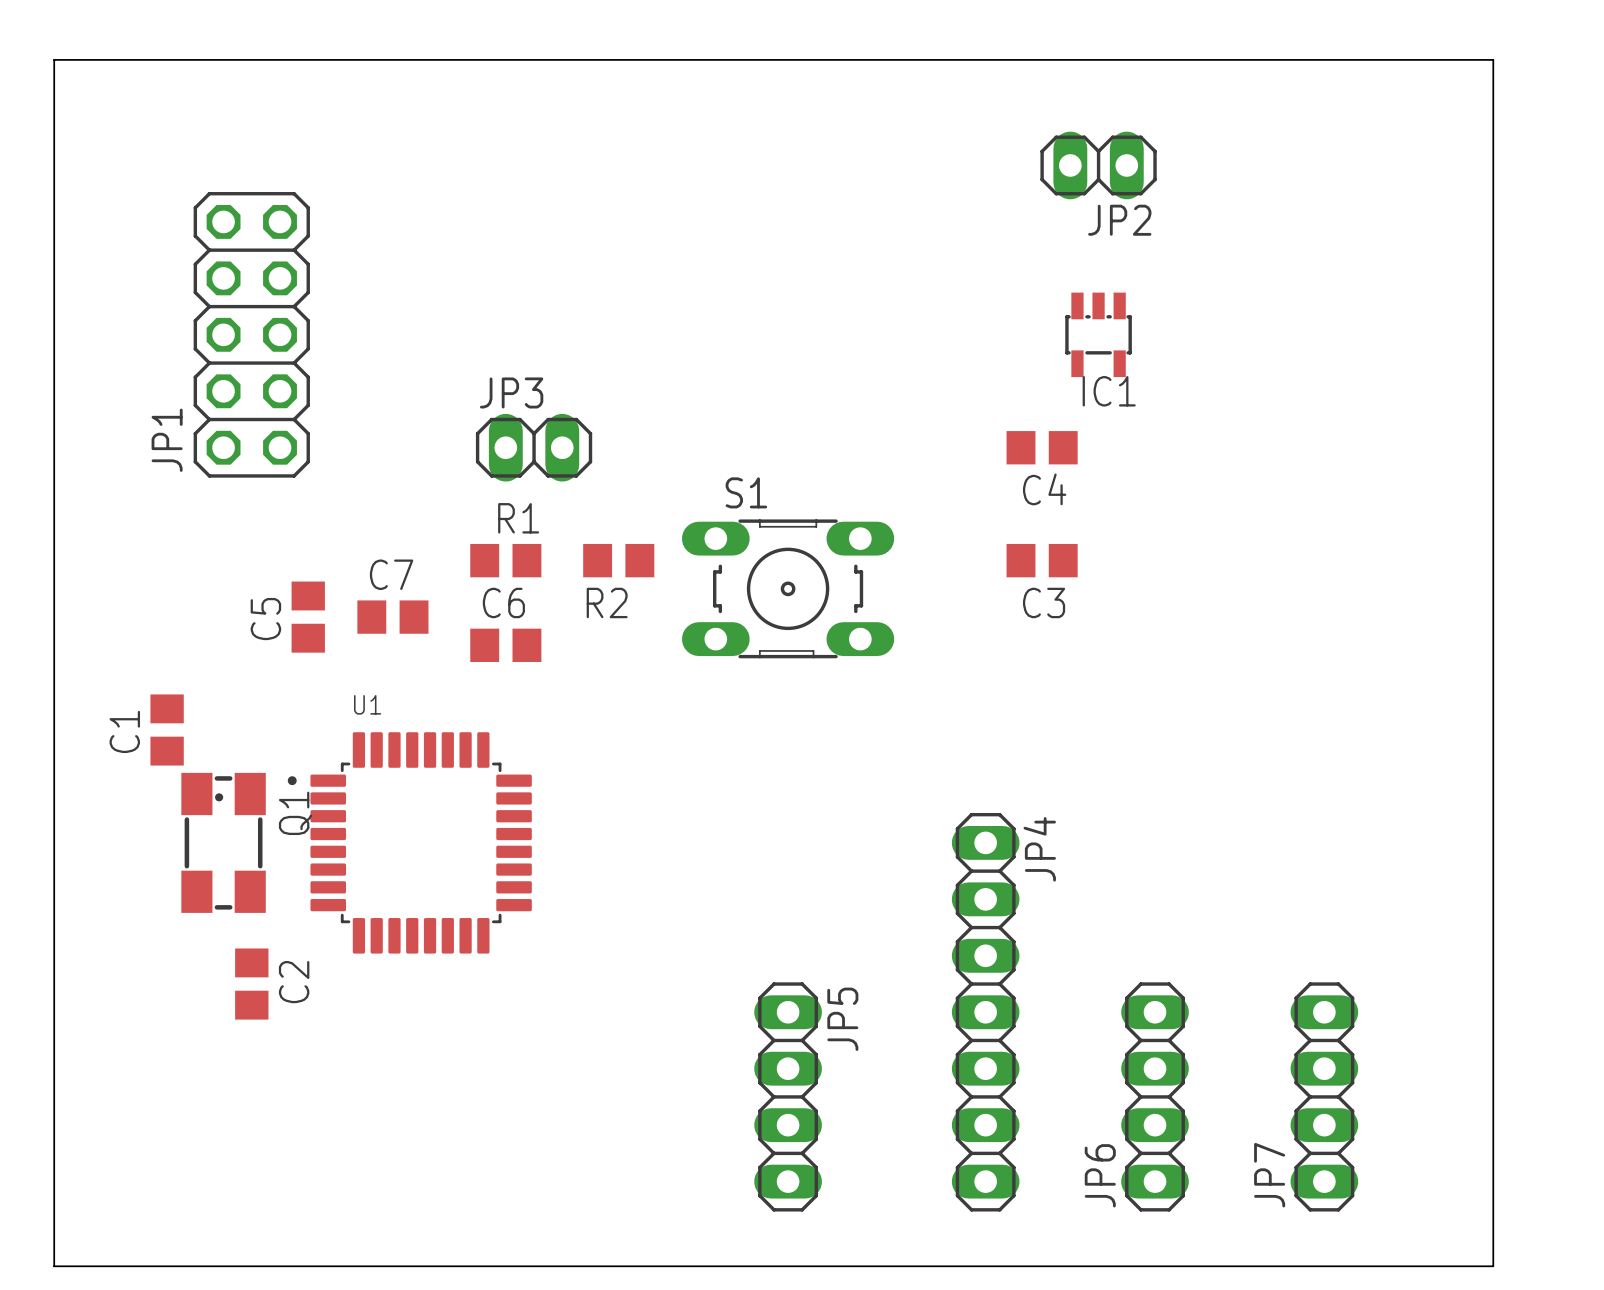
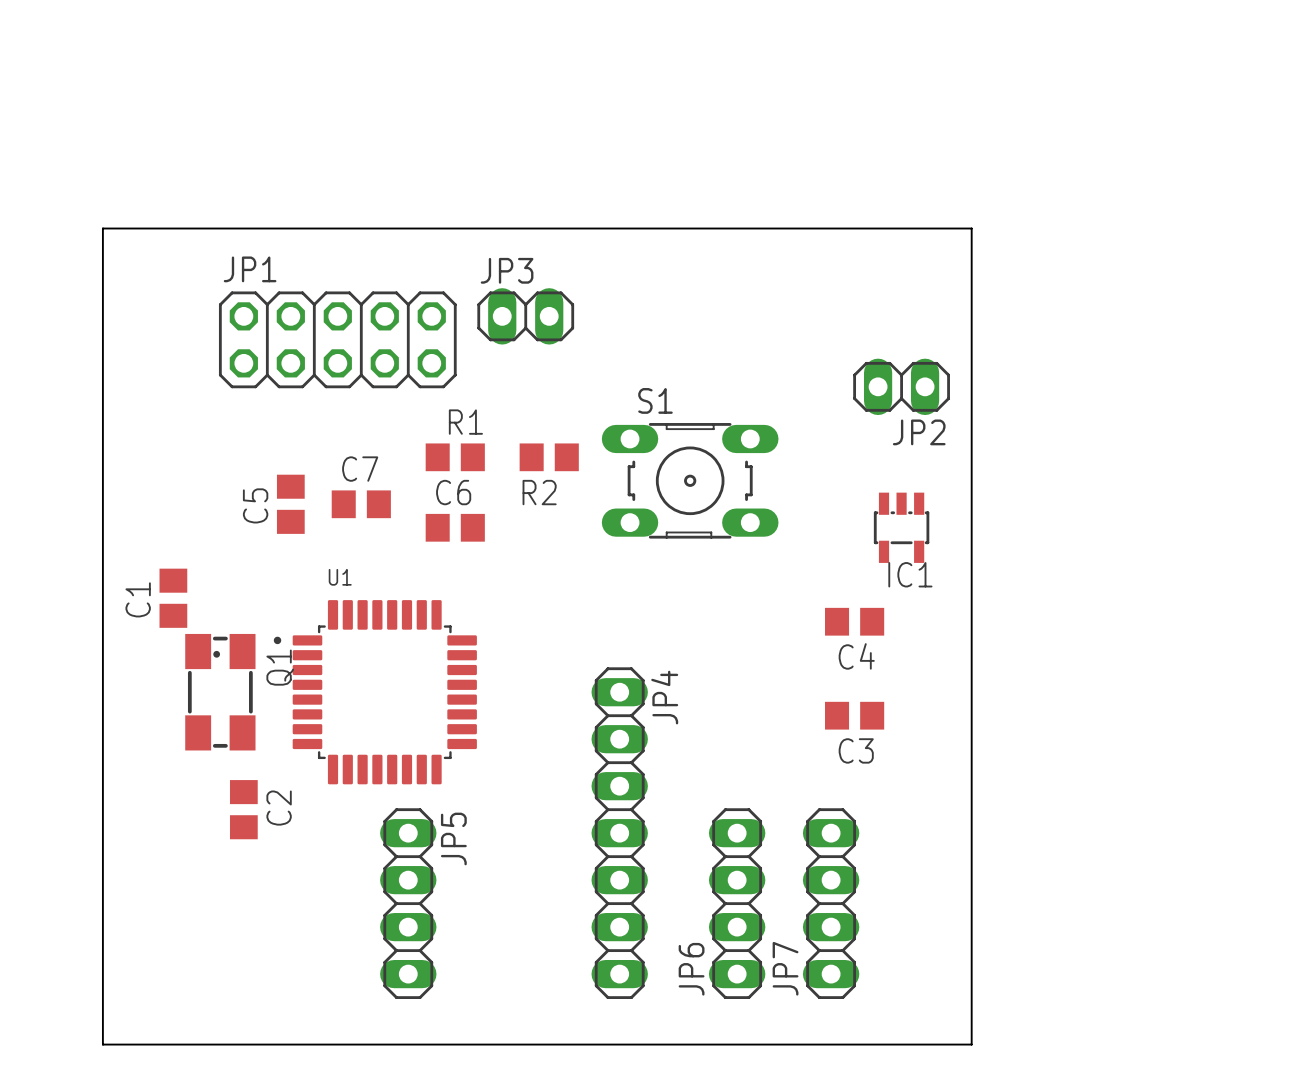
JP2 position: (1098, 165) -> (901, 386)
JP1 rotation: 0° (251, 334) -> 90° clockwise (337, 339)
IC1 position: (1098, 334) -> (901, 527)
JP3 position: (534, 447) -> (525, 316)
C4 position: (1042, 447) -> (854, 621)
C3 position: (1042, 560) -> (854, 715)
JP4 position: (985, 1012) -> (619, 833)
JP5 position: (788, 1096) -> (408, 903)
JP6 position: (1155, 1096) -> (737, 903)
JP7 position: (1324, 1096) -> (831, 903)
board edge: (82, 1266) (54, 1266) (54, 59) (1493, 59) (1493, 1266) (1126, 1266) -> (102, 1044) (102, 228) (971, 228) (971, 1044)

